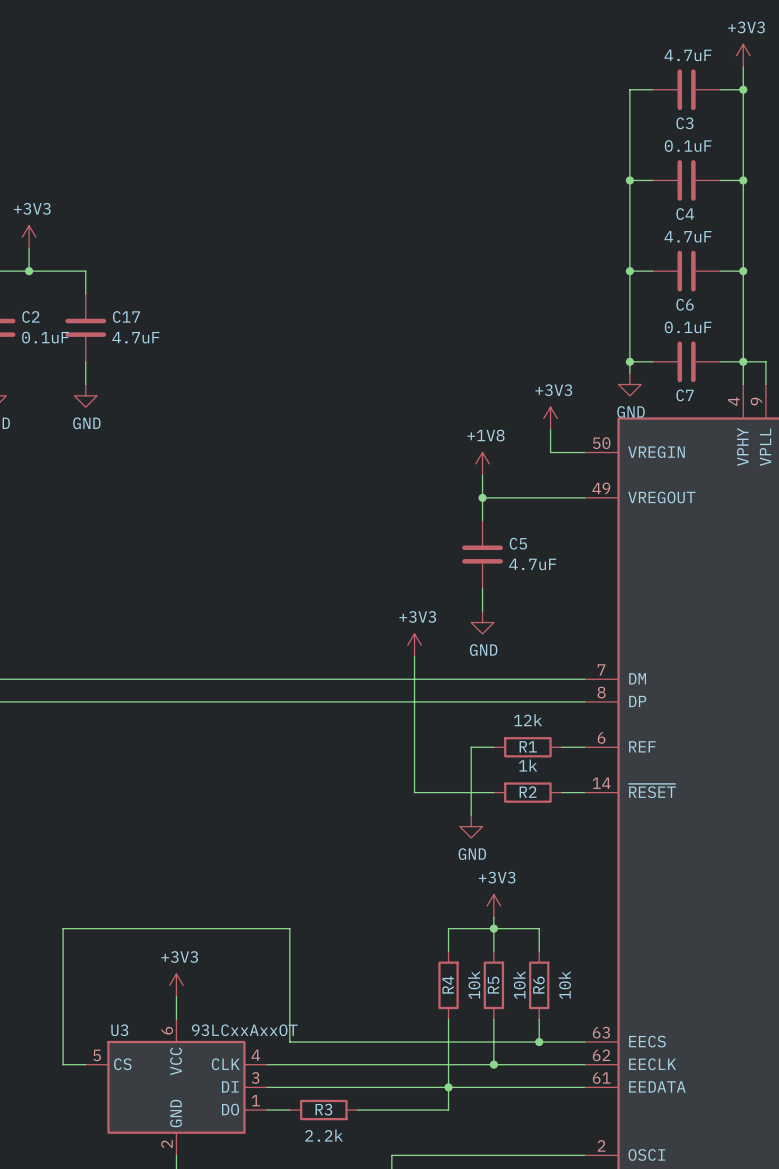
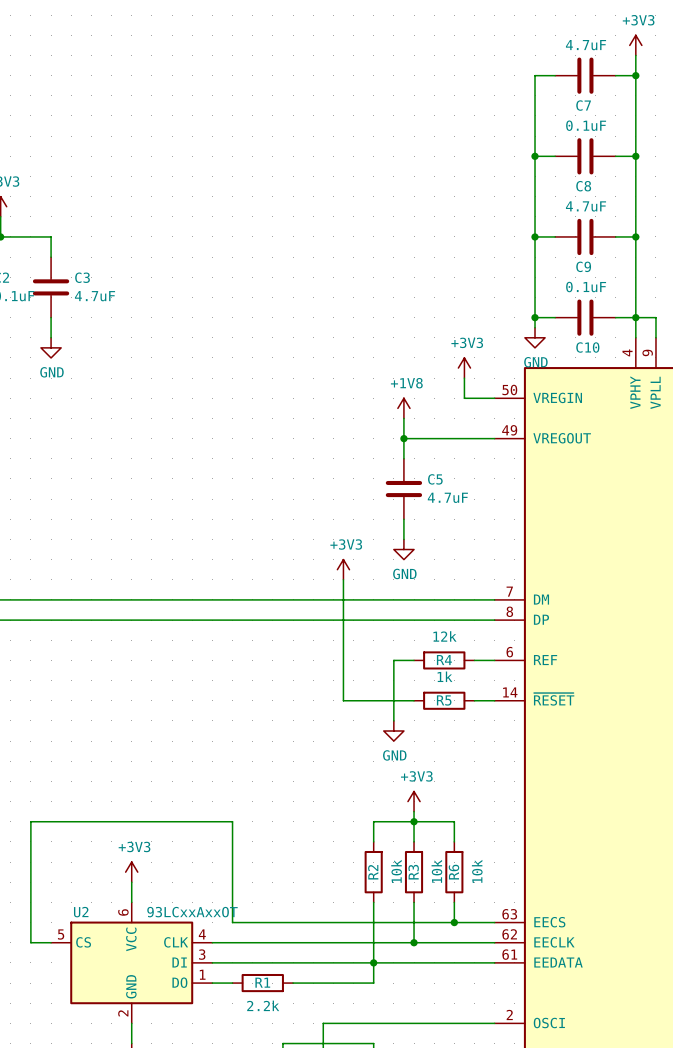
C3 name: C3 (684, 123) -> C7 (583, 105)
C4 name: C4 (685, 214) -> C8 (583, 186)
C6 name: C6 (685, 304) -> C9 (583, 266)
C17 name: C17 (126, 316) -> C3 (82, 277)
C7 name: C7 (685, 395) -> C10 (587, 347)
R1 name: R1 (528, 746) -> R4 (444, 660)
R2 name: R2 (528, 792) -> R5 (444, 700)
R4 name: R4 (448, 984) -> R2 (373, 872)
R5 name: R5 (493, 985) -> R3 (413, 872)
U3 name: U3 (119, 1030) -> U2 (81, 912)
R3 name: R3 (323, 1109) -> R1 (262, 982)

